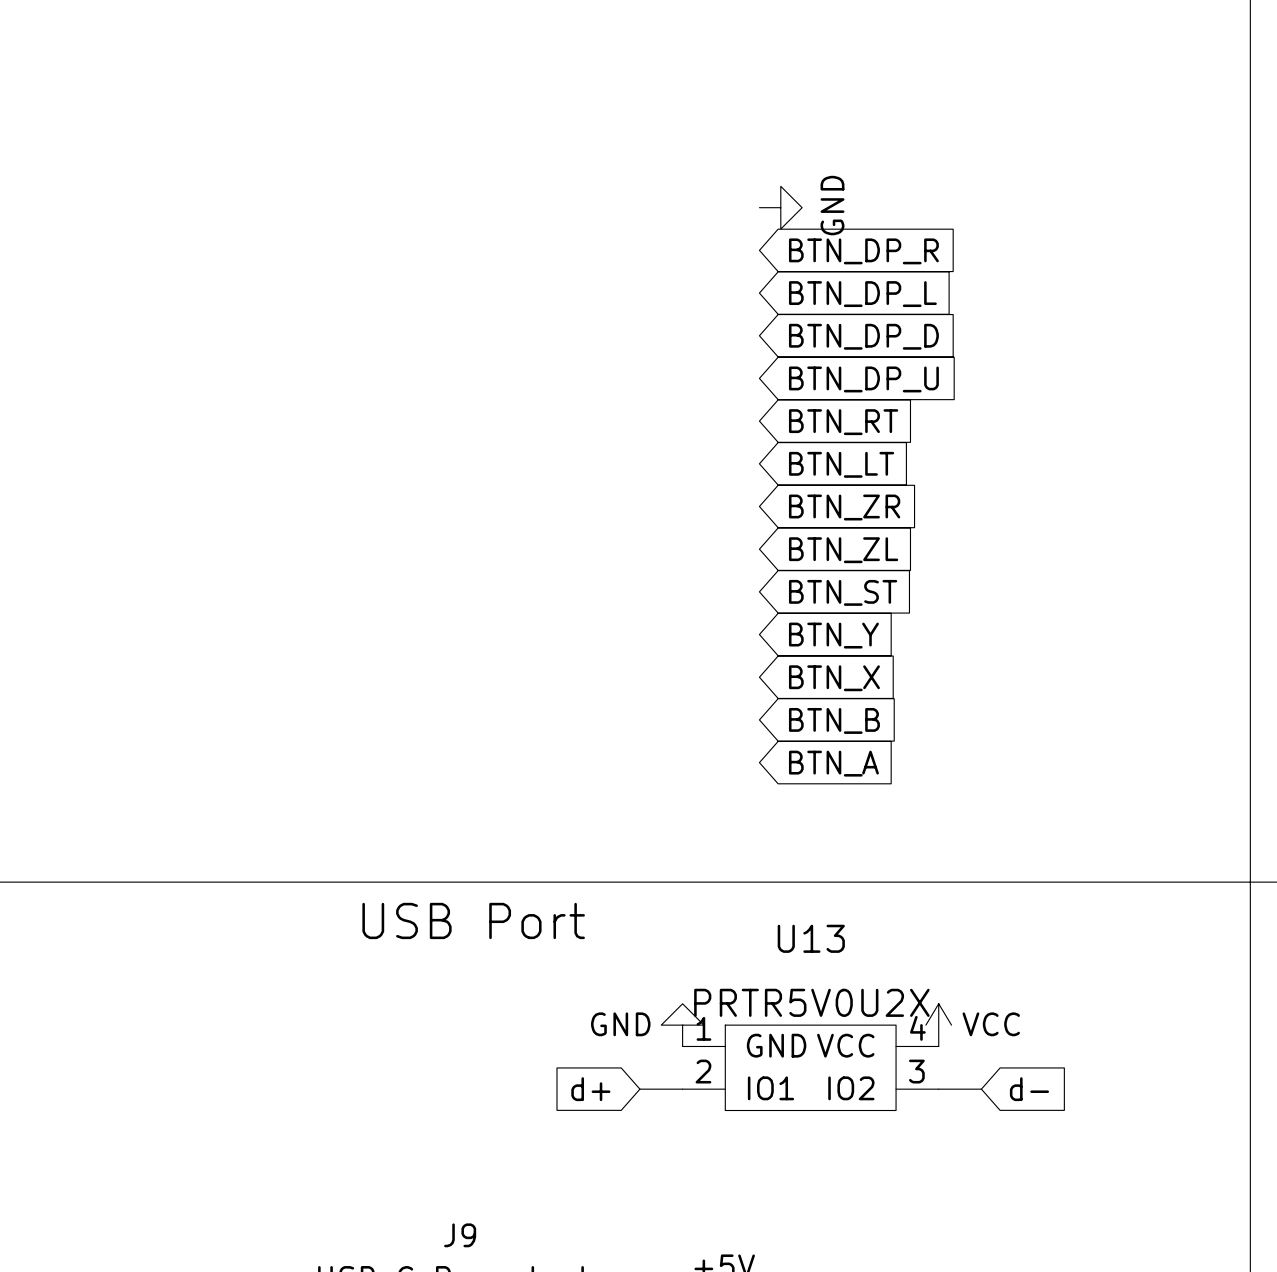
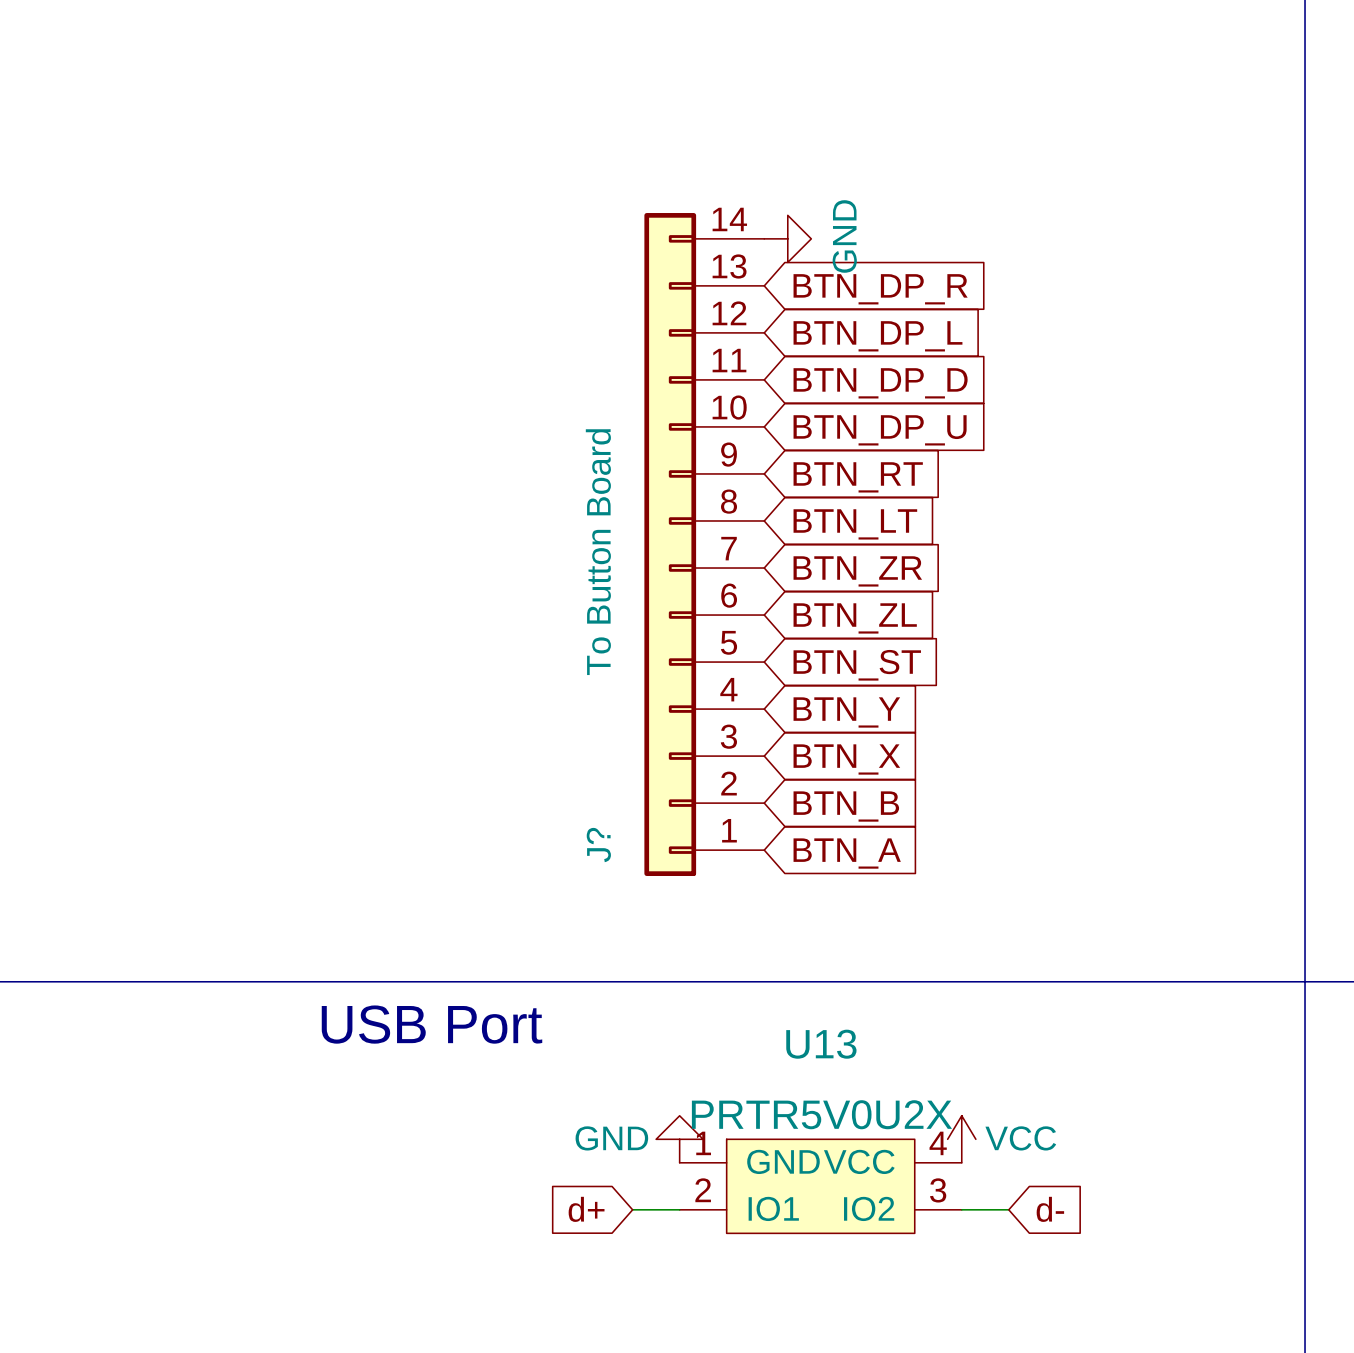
J?: none -> To Button Board (704, 544)

